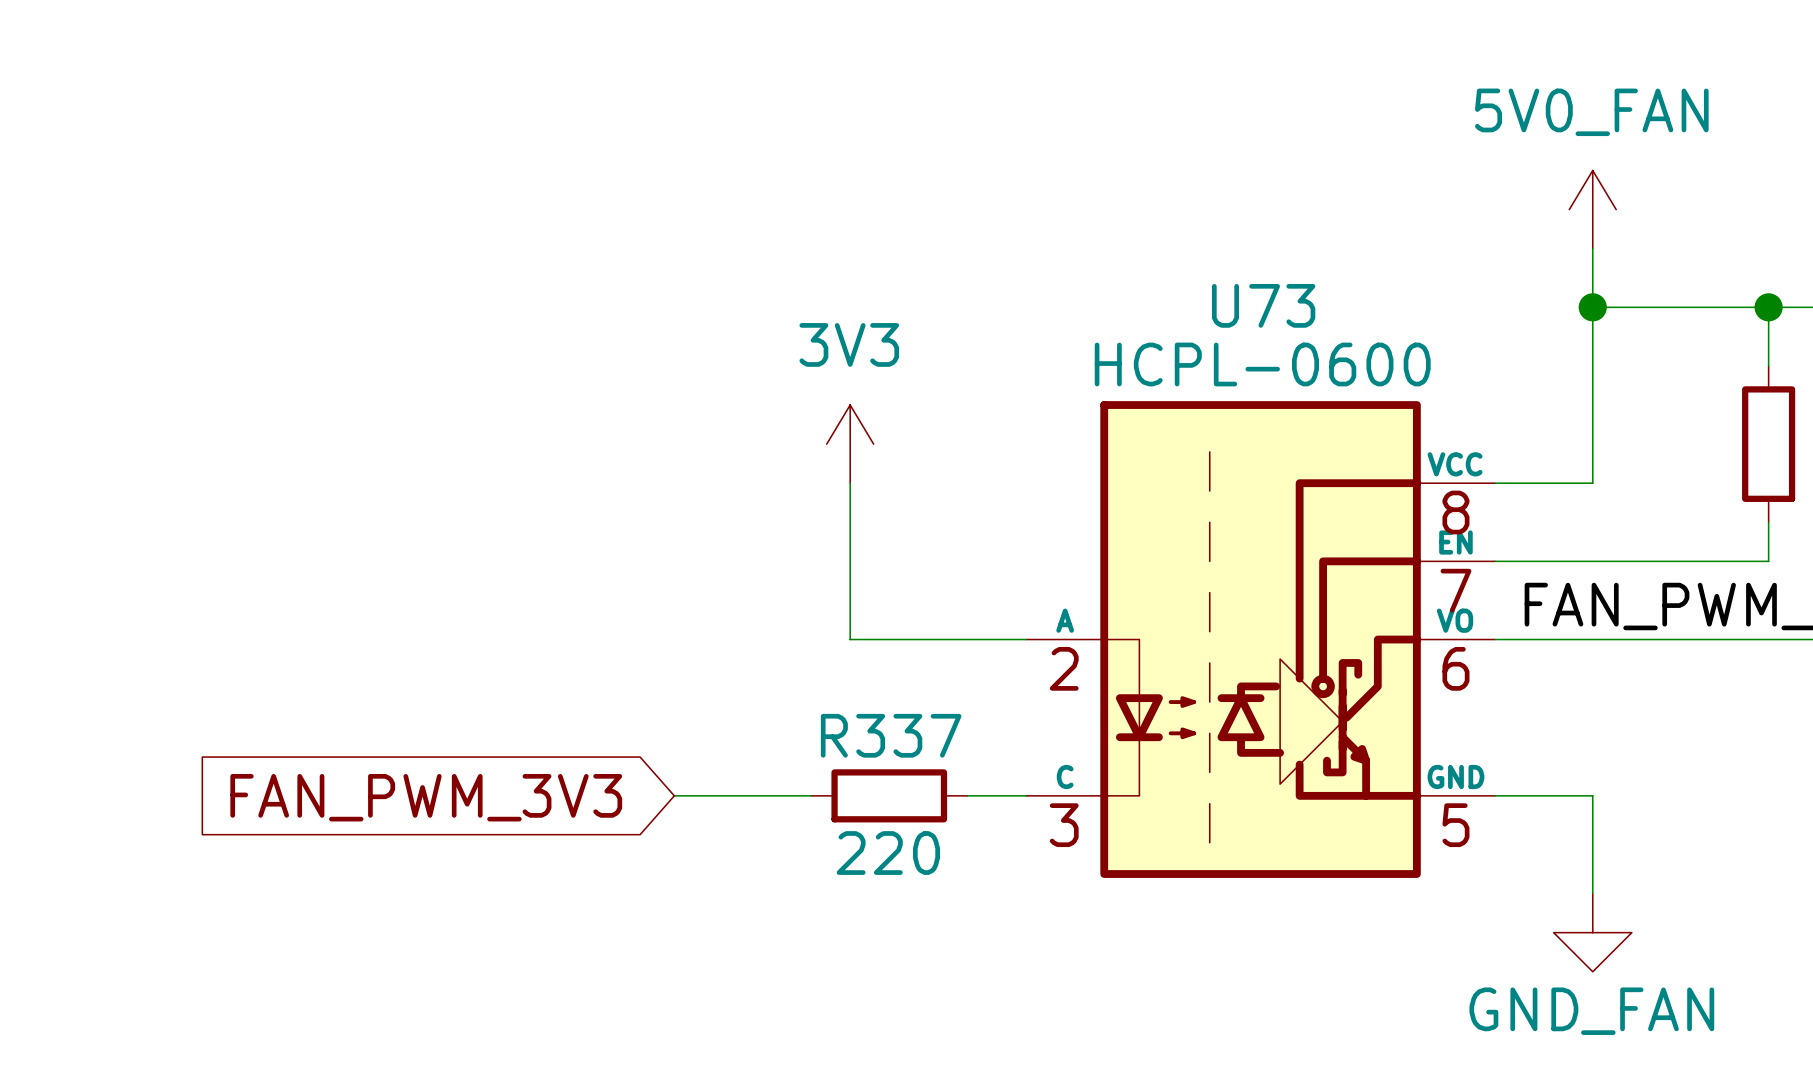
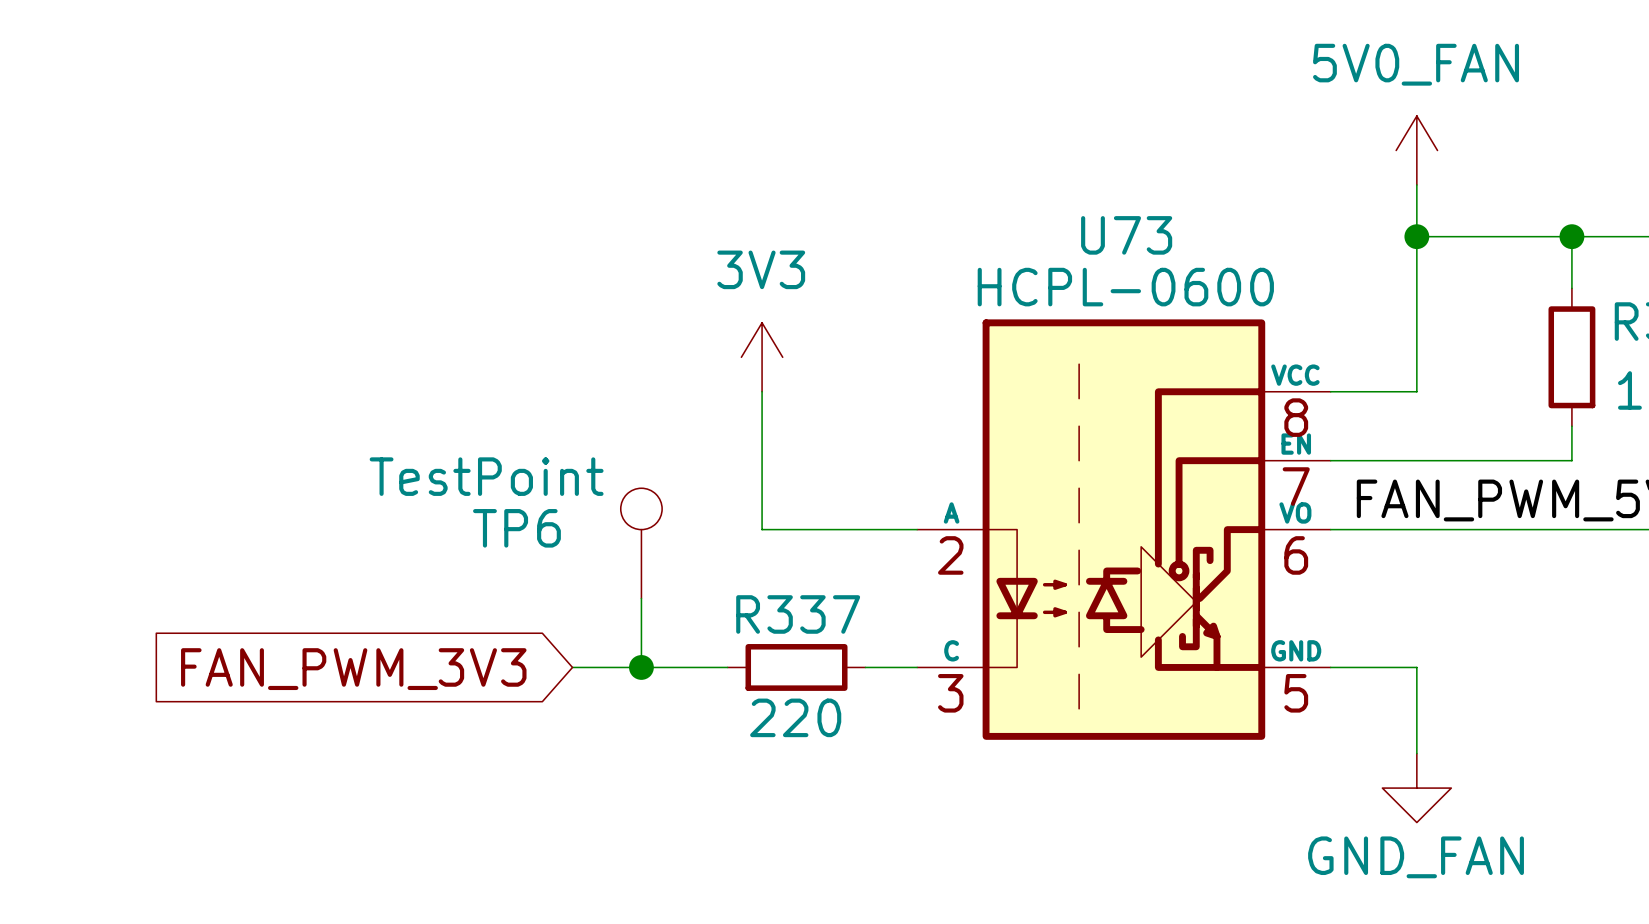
TP6: none -> TestPoint (641, 543)
wire: none -> (641, 598) (641, 667)
wire: none -> (572, 667) (606, 667)
junction: none -> (641, 667)
global label position: FAN_PWM_3V3 (426, 797) -> FAN_PWM_3V3 (353, 669)

